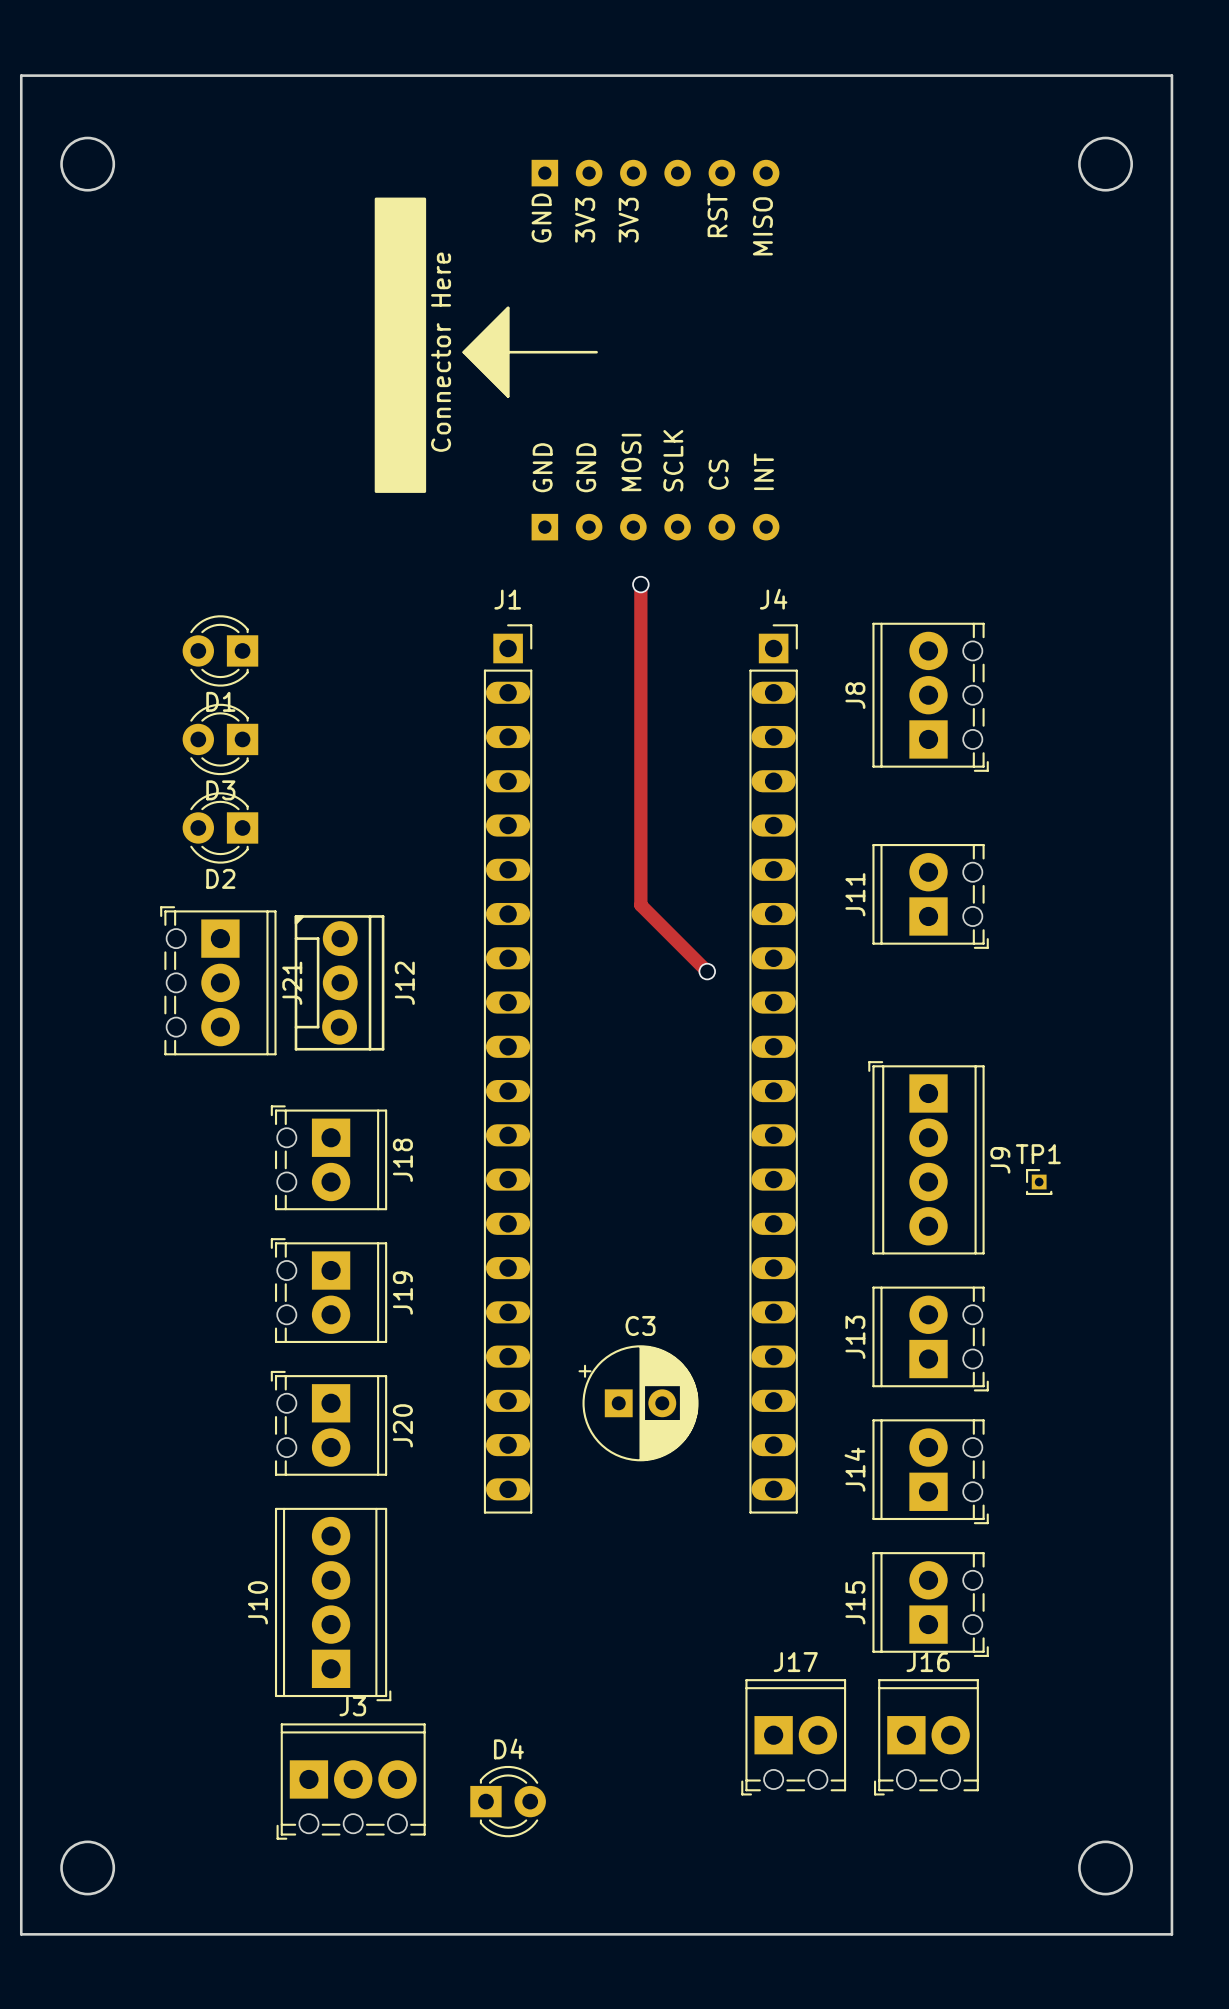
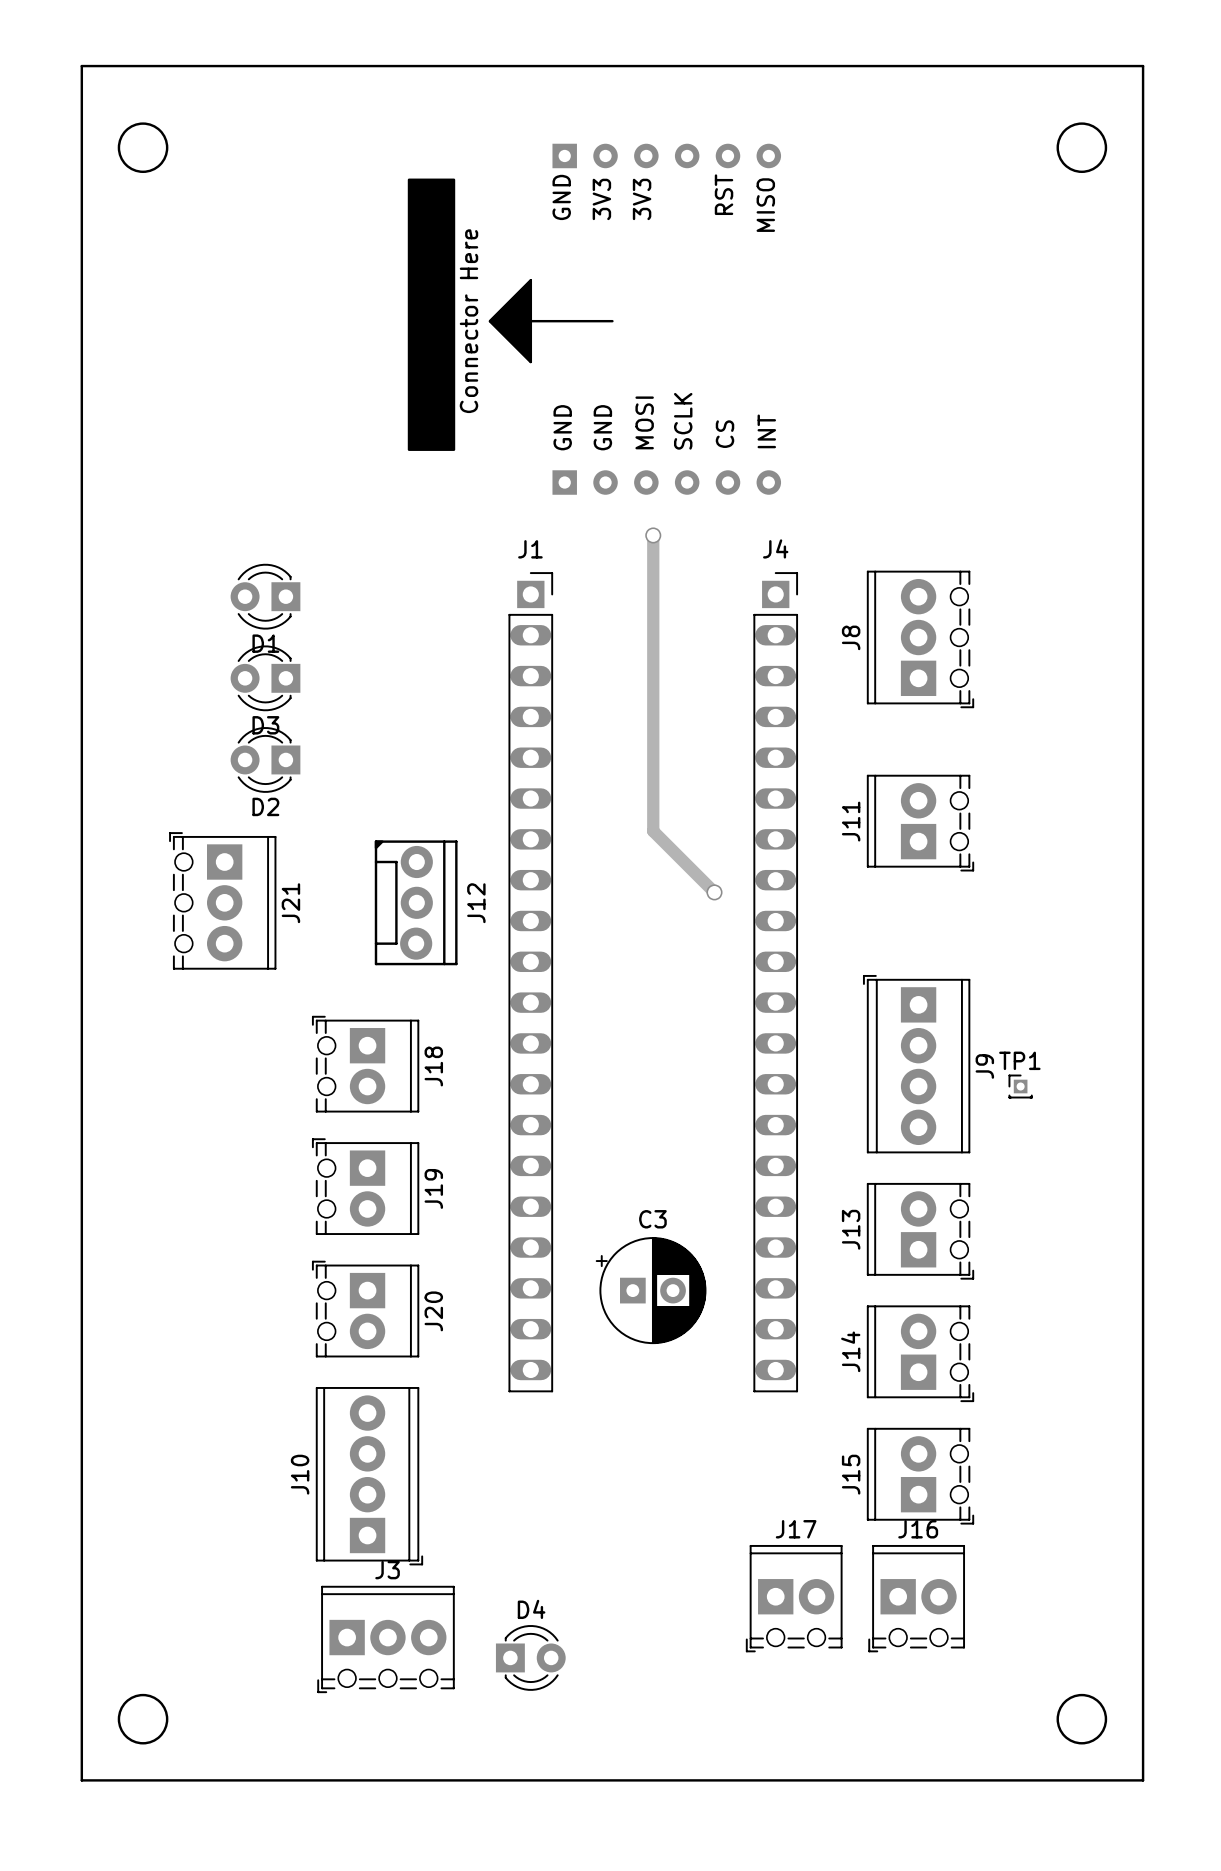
J21 position: (218, 980) -> (222, 900)
J12 position: (339, 982) -> (416, 902)

